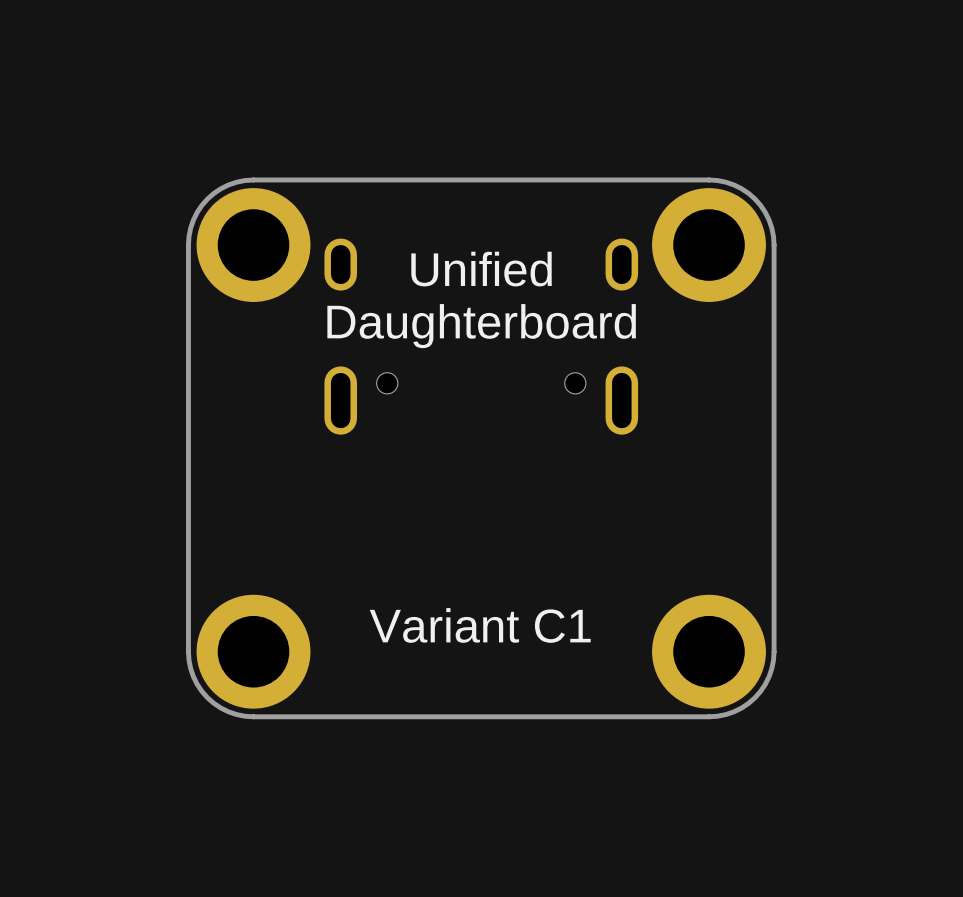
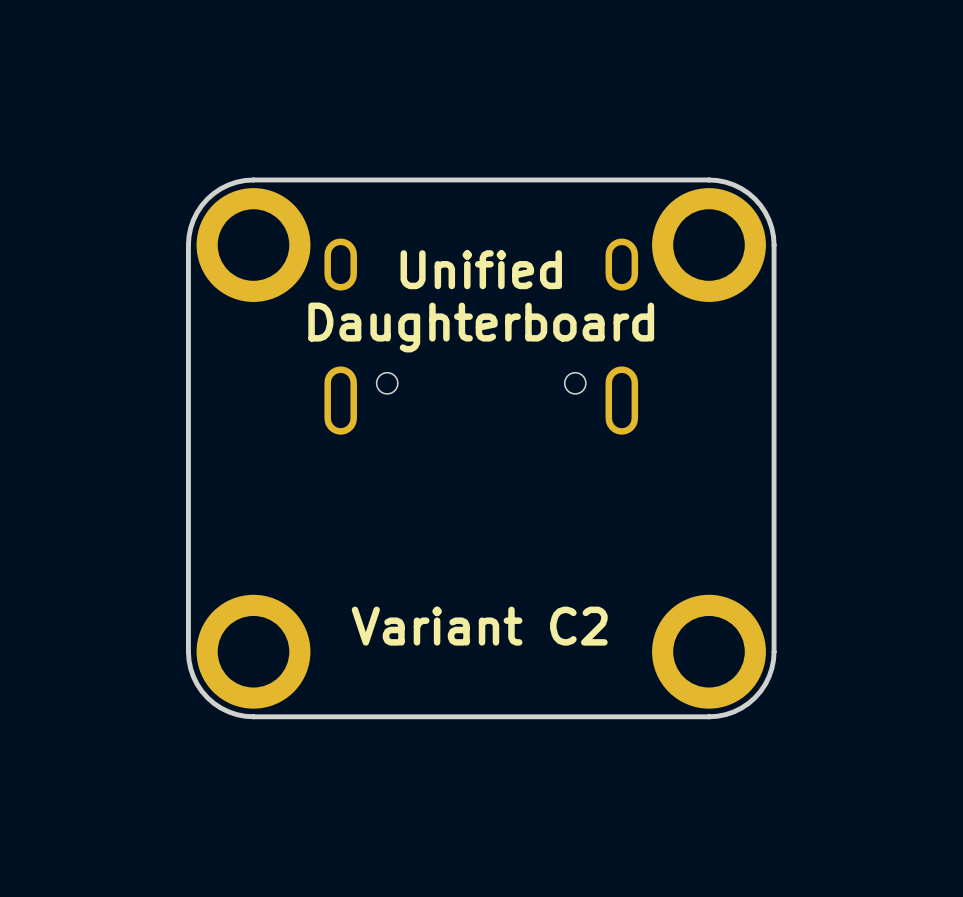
text: Variant C1 (480, 625) -> Variant C2 (479, 626)

